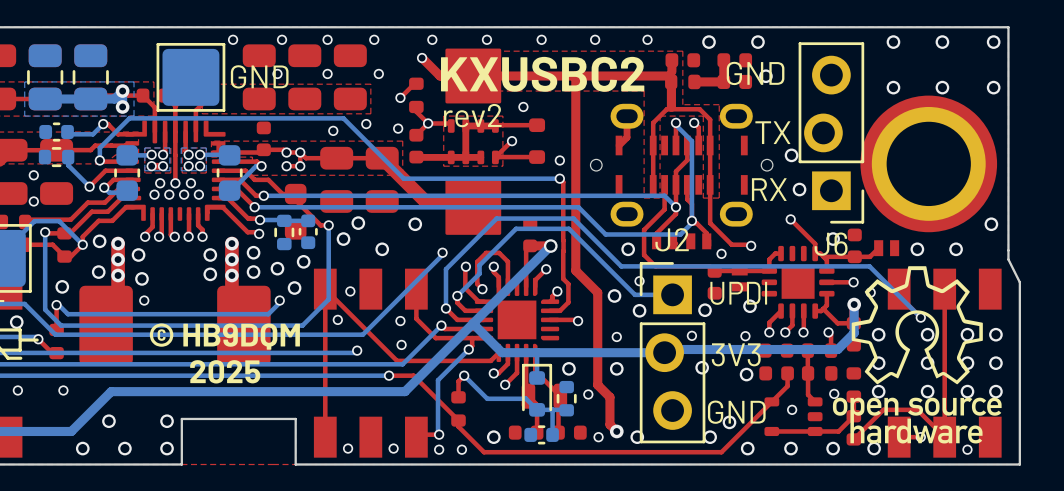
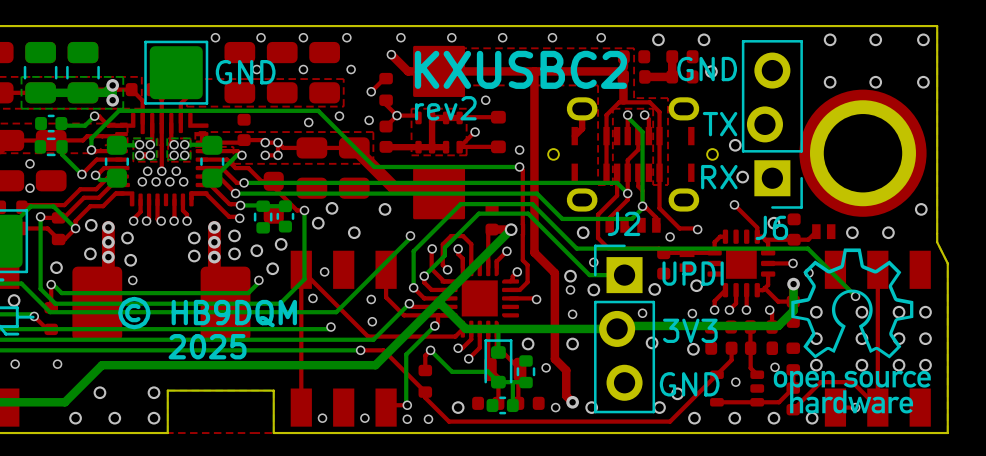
via: none -> (570, 289)
via: (967, 449) -> none

